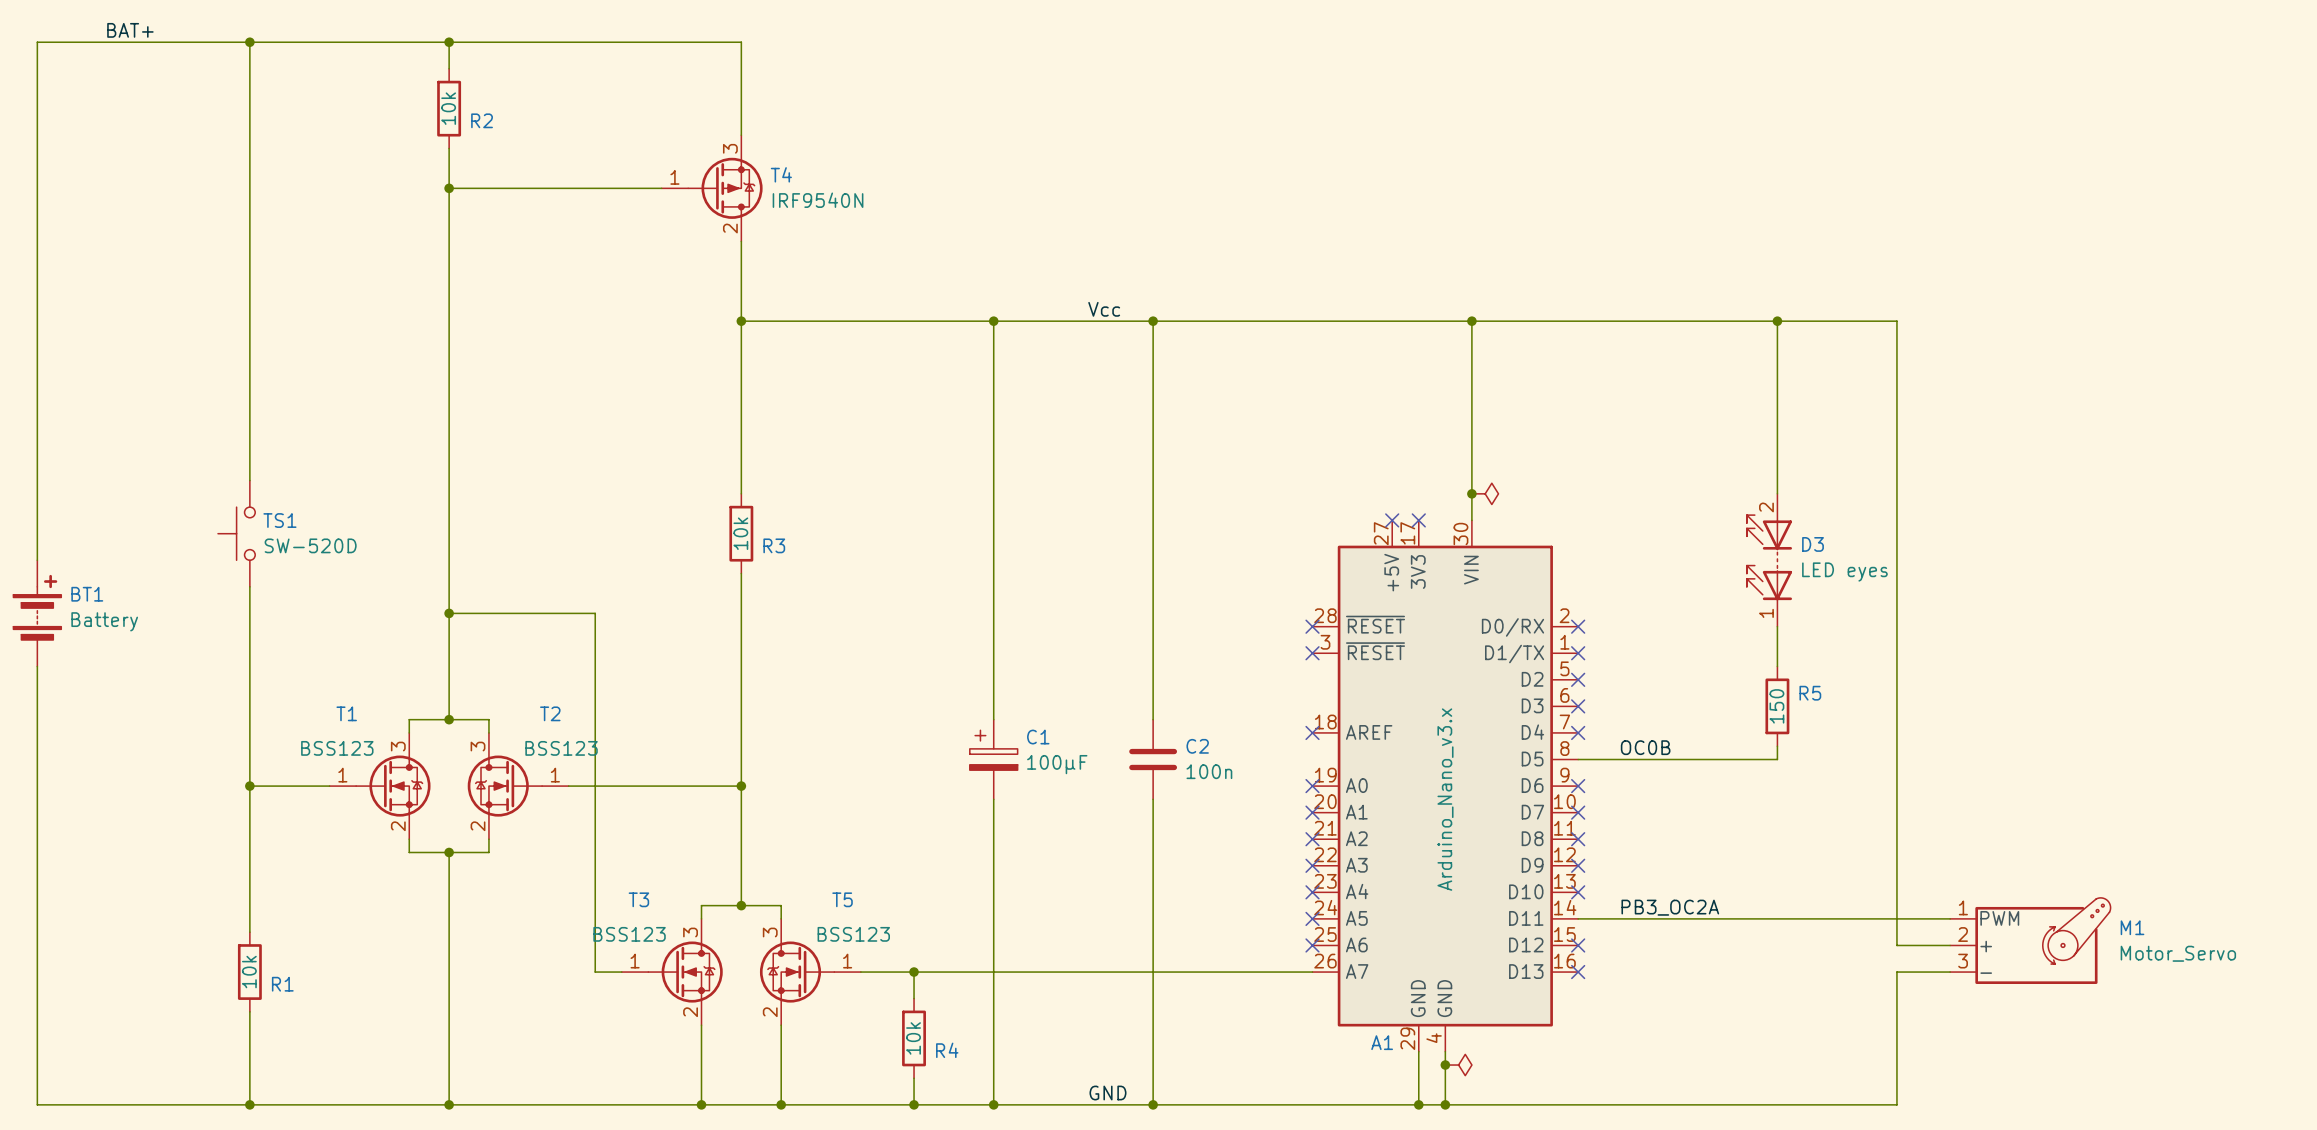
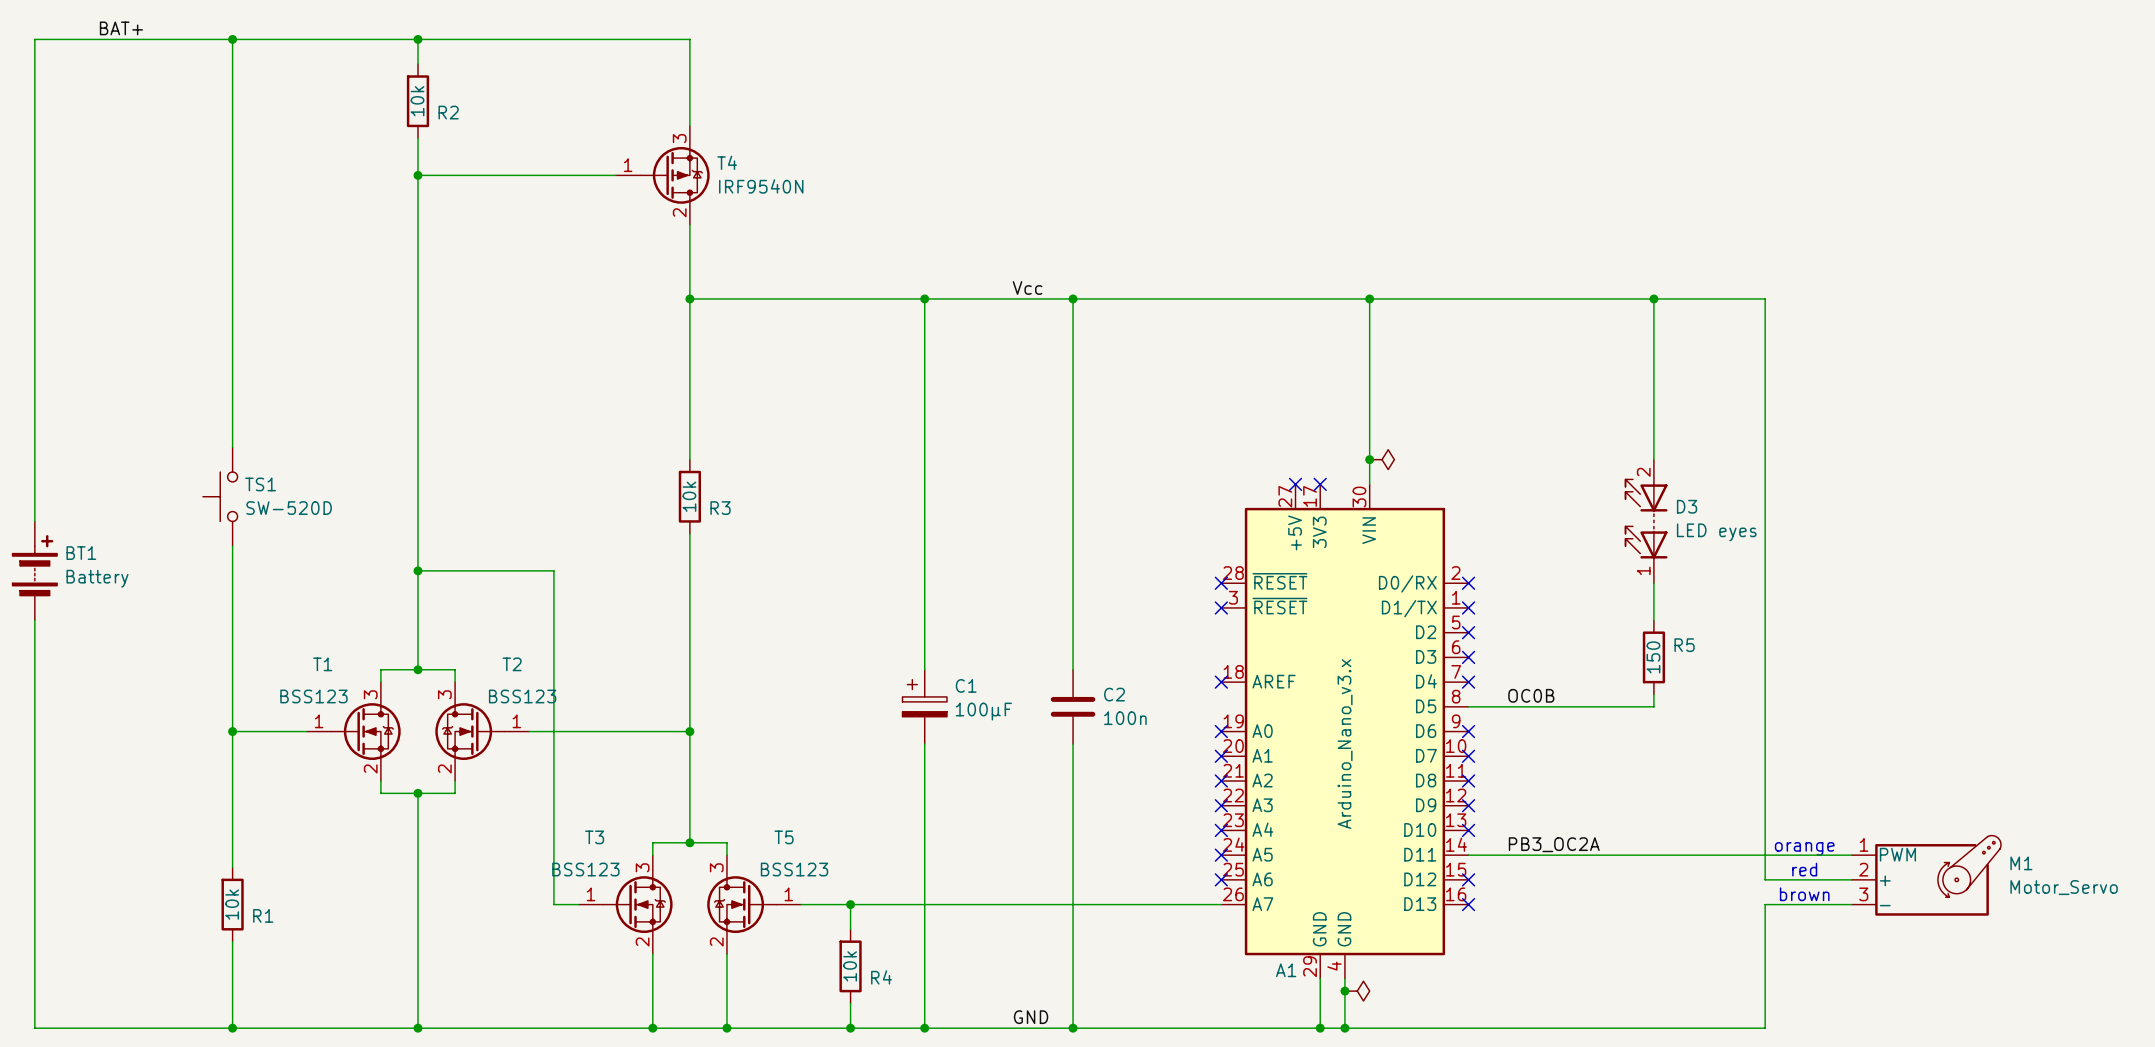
text: none -> orange (1804, 848)
text: none -> red (1804, 869)
M1 position: (2030, 940) -> (1926, 875)
text: none -> brown (1804, 894)

